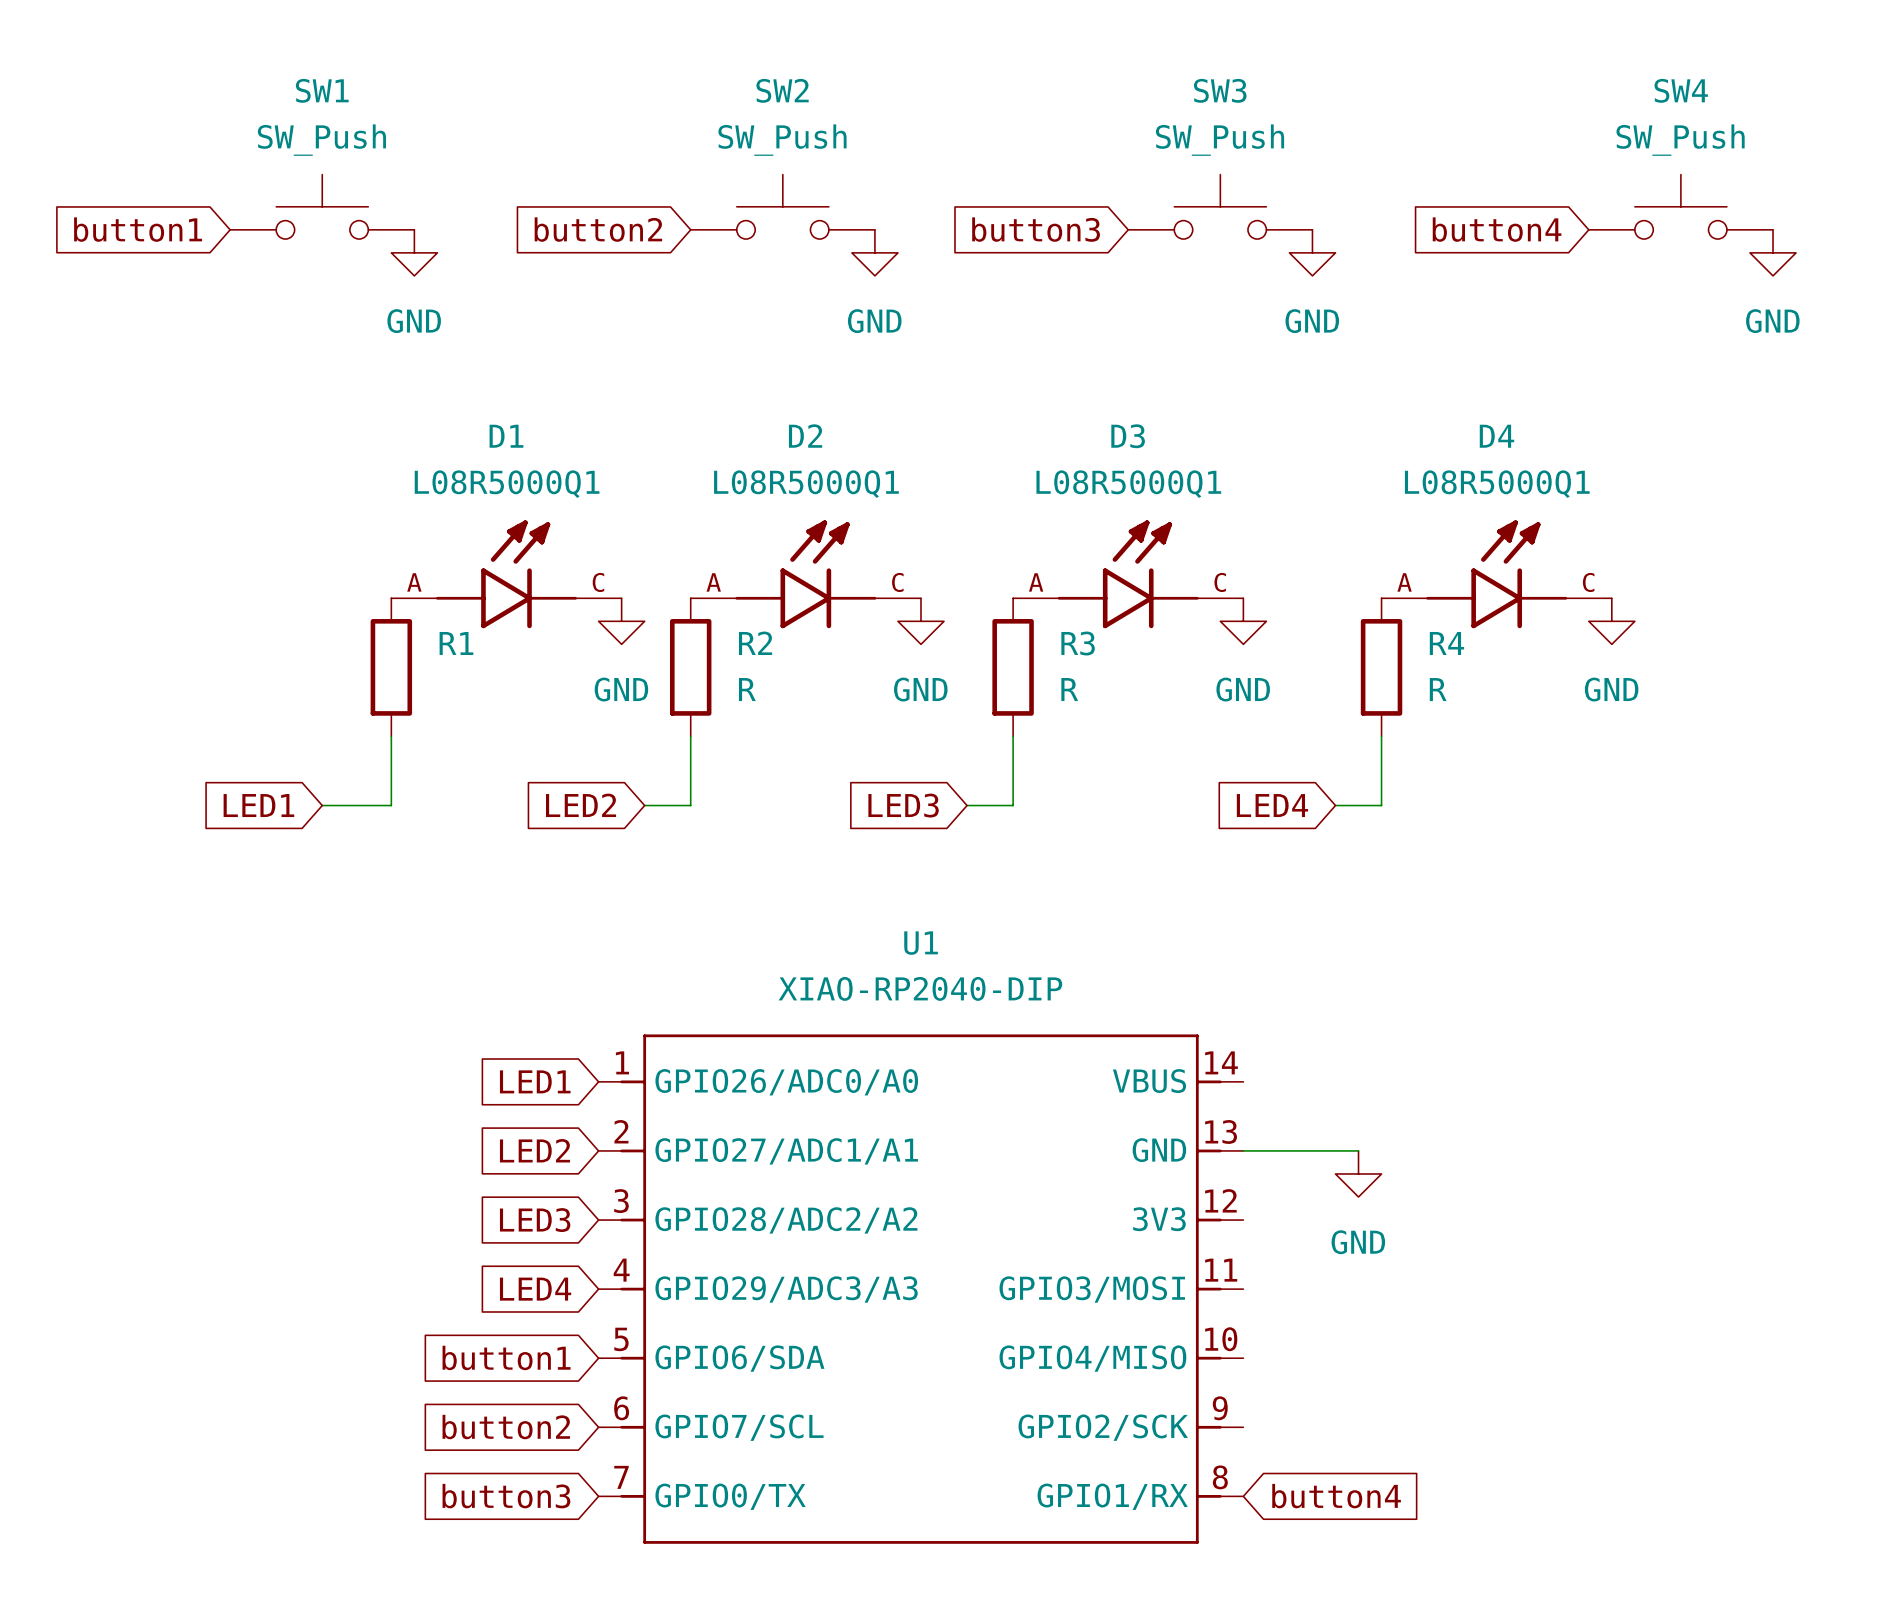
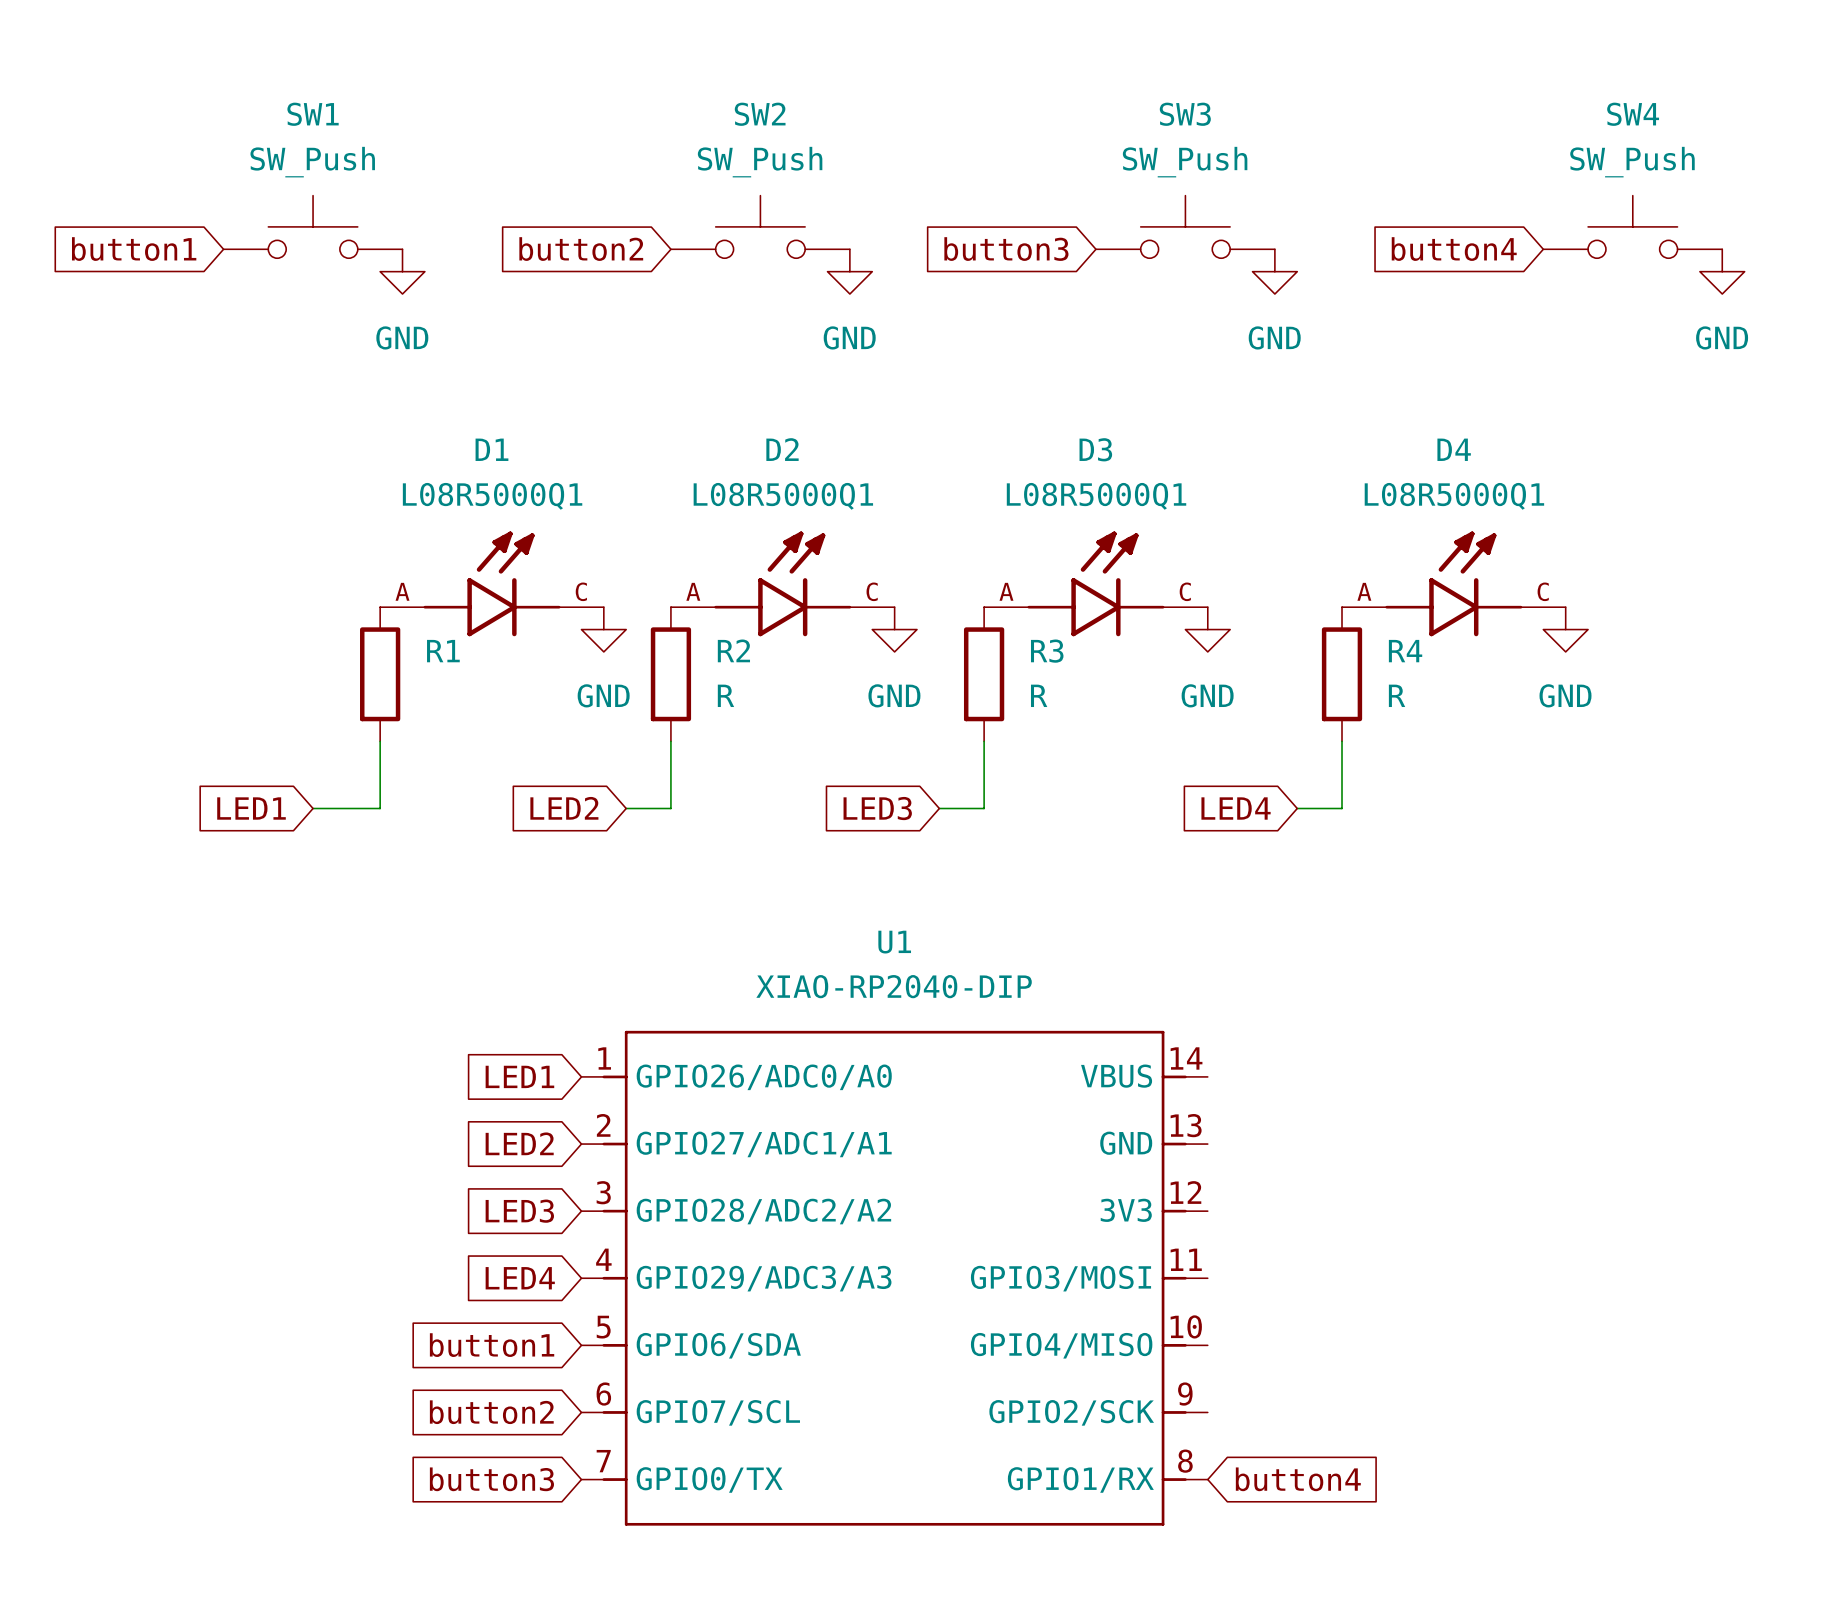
wire: (1243, 1150) (1358, 1150) -> none
power symbol: GND (1358, 1173) -> none

